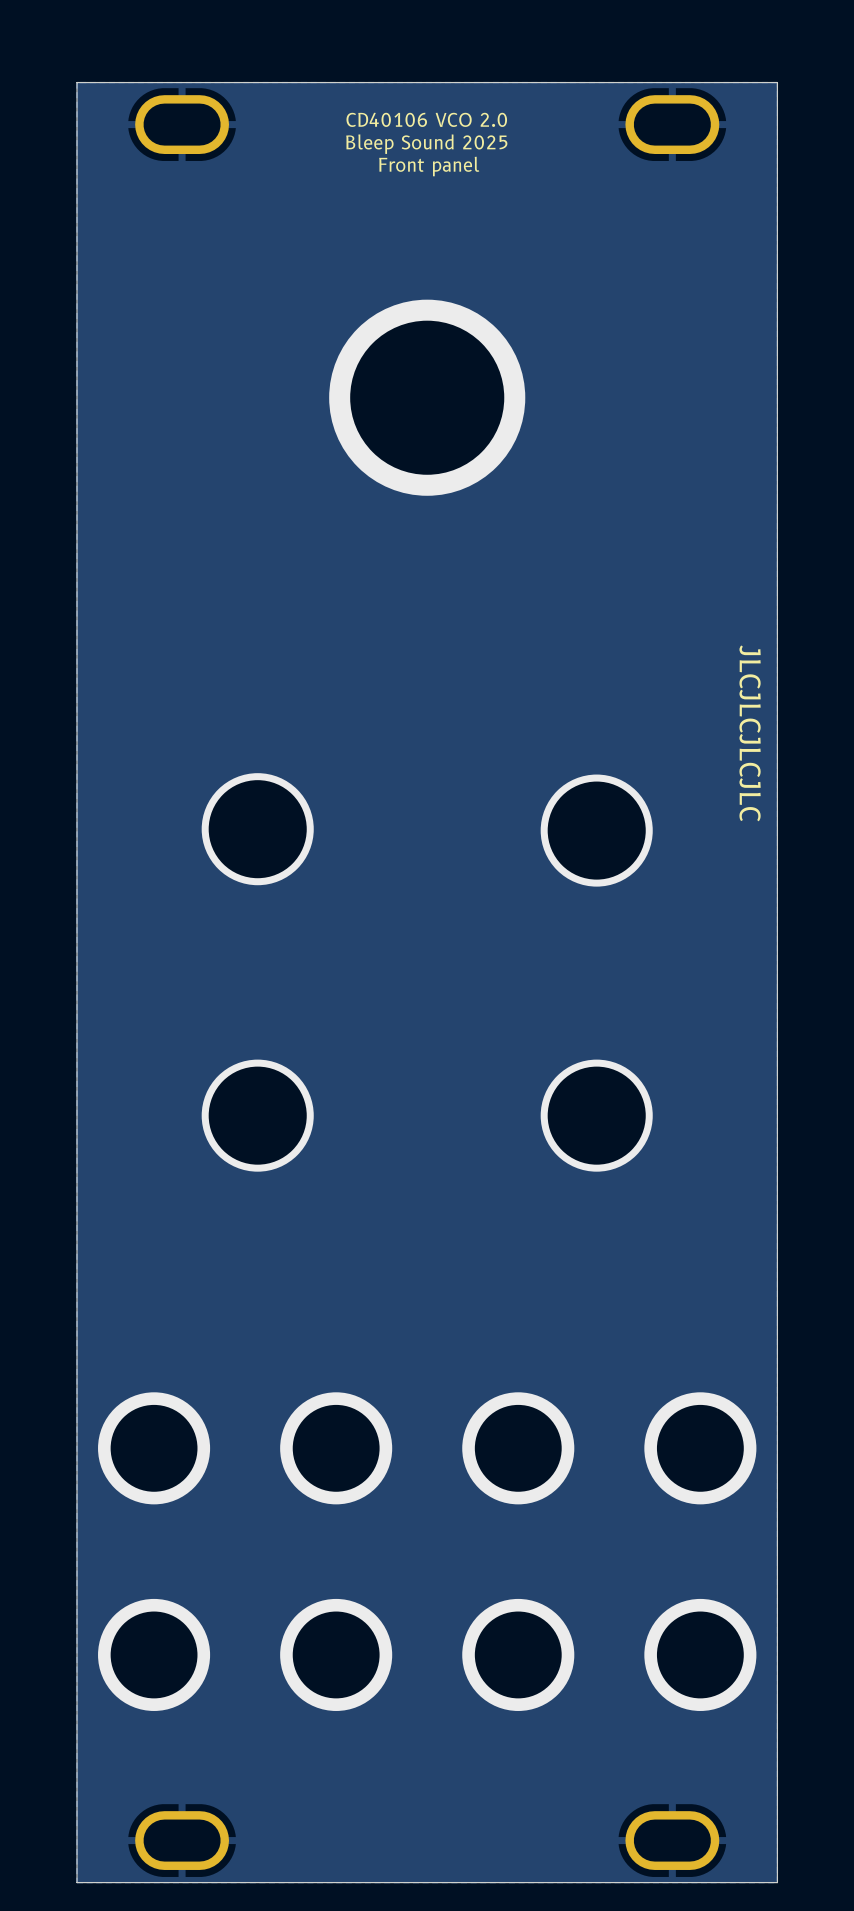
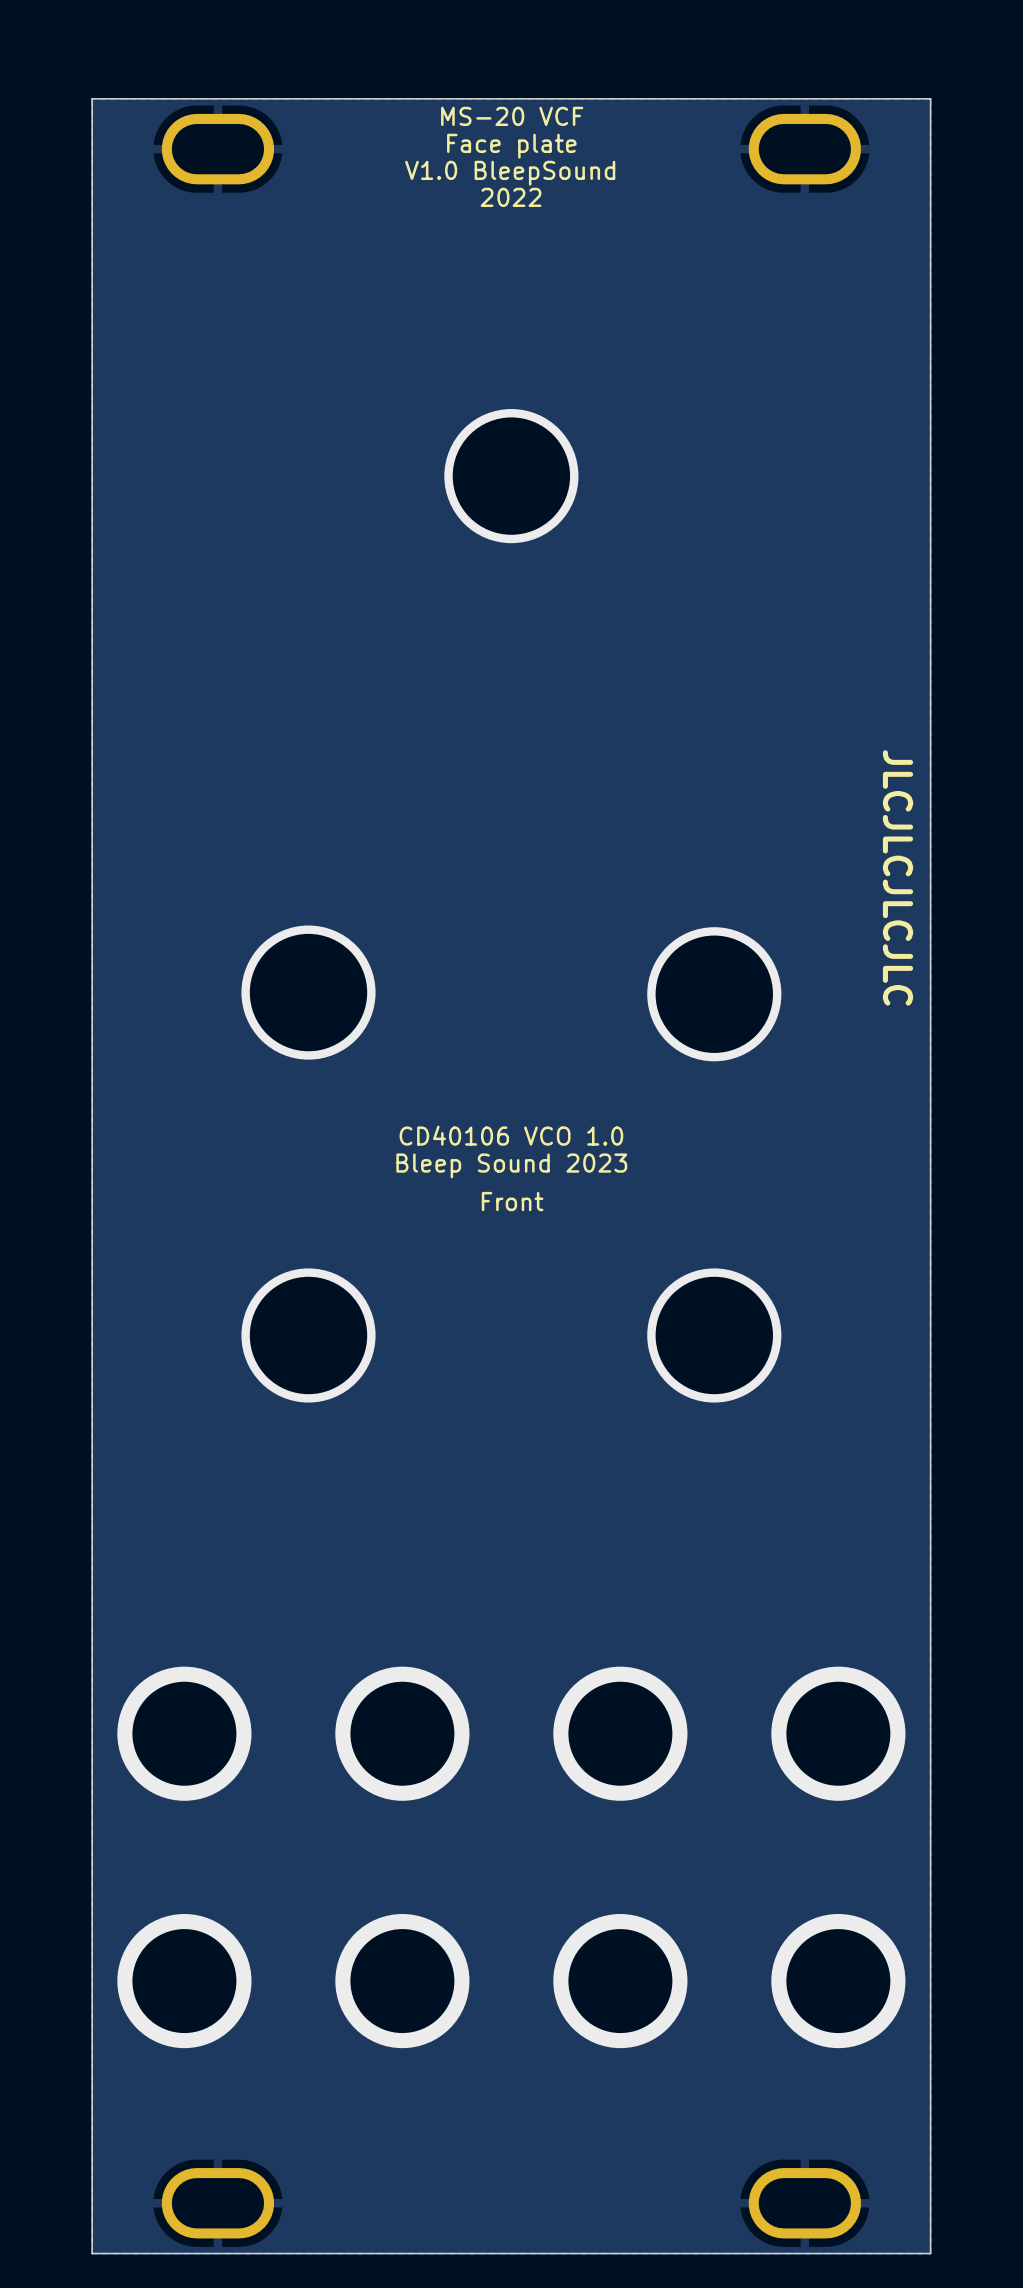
text: none -> MS-20 VCF (512, 116)
text: CD40106 VCO 2.0 (426, 119) -> Face plate (511, 146)
text: Bleep Sound 2025 (426, 144) -> V1.0 BleepSound (510, 173)
text: Front panel (429, 166) -> 2022 (511, 197)
via size: [329, 299, 526, 496] -> [444, 409, 579, 544]
text: none -> CD40106 VCO 1.0 (511, 1135)
text: none -> Bleep Sound 2023 (511, 1165)
text: none -> Front (512, 1201)

